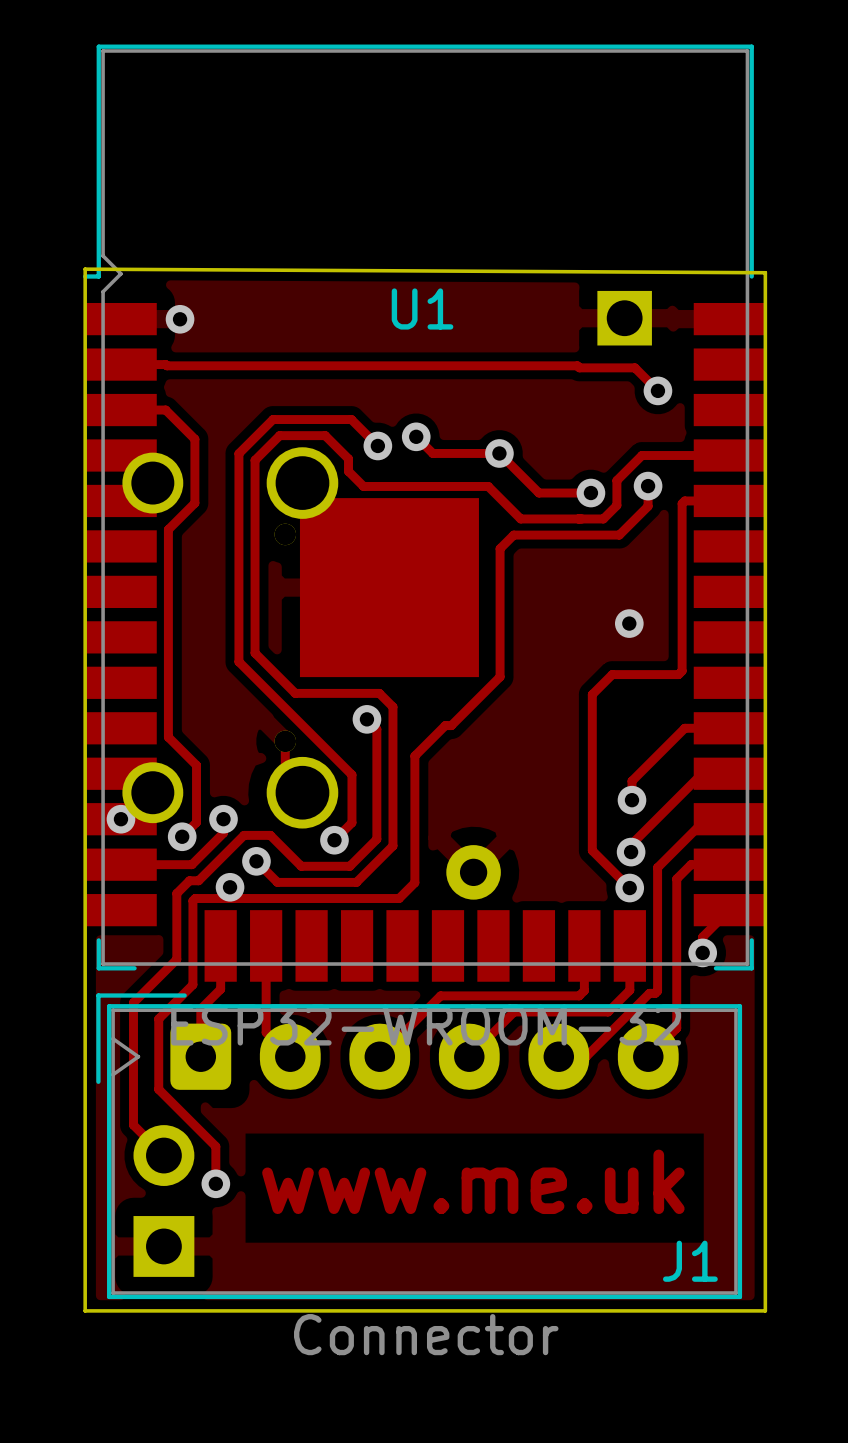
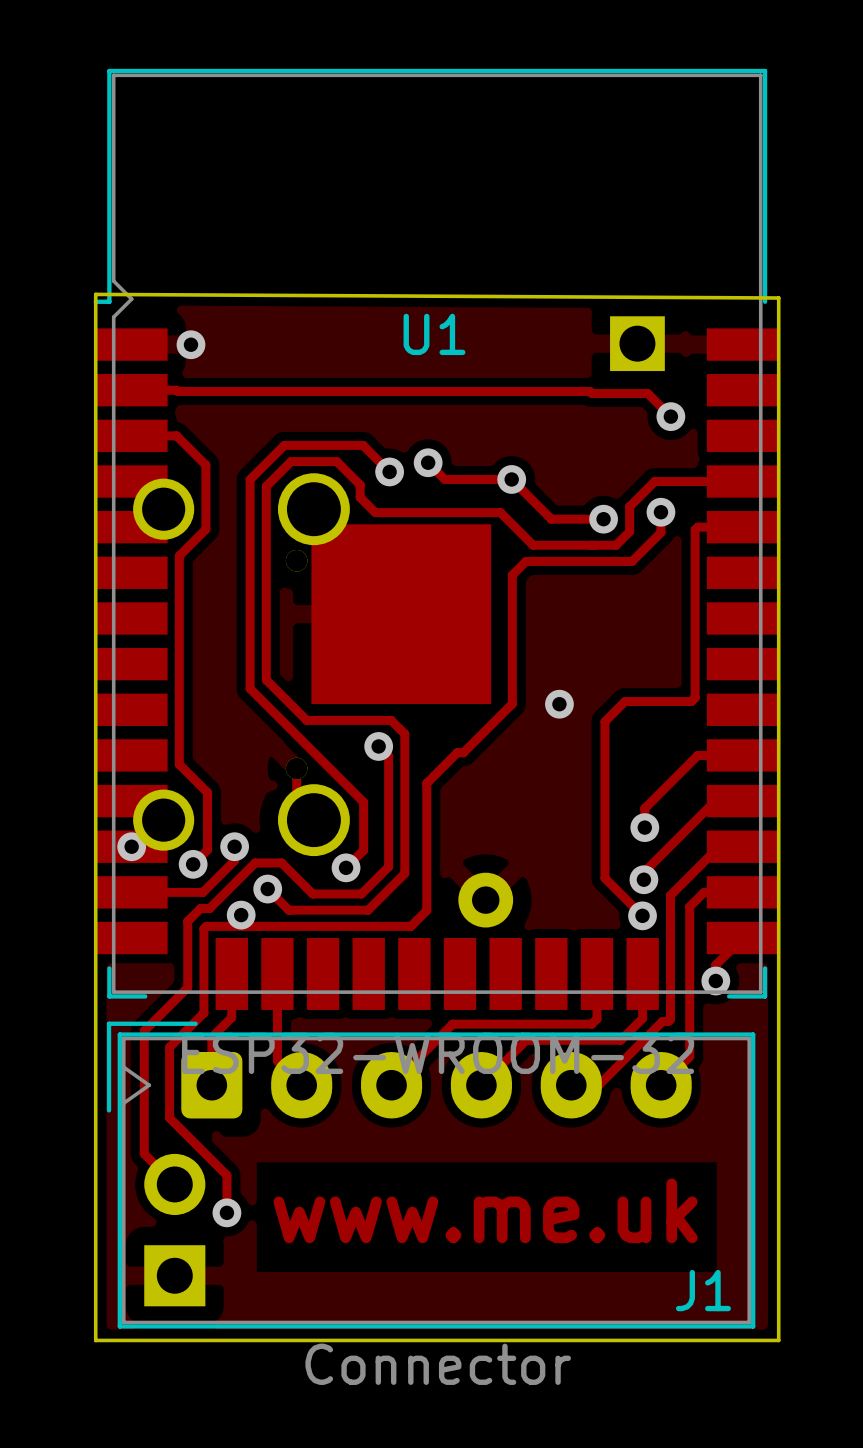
via position: (629, 623) -> (559, 704)

